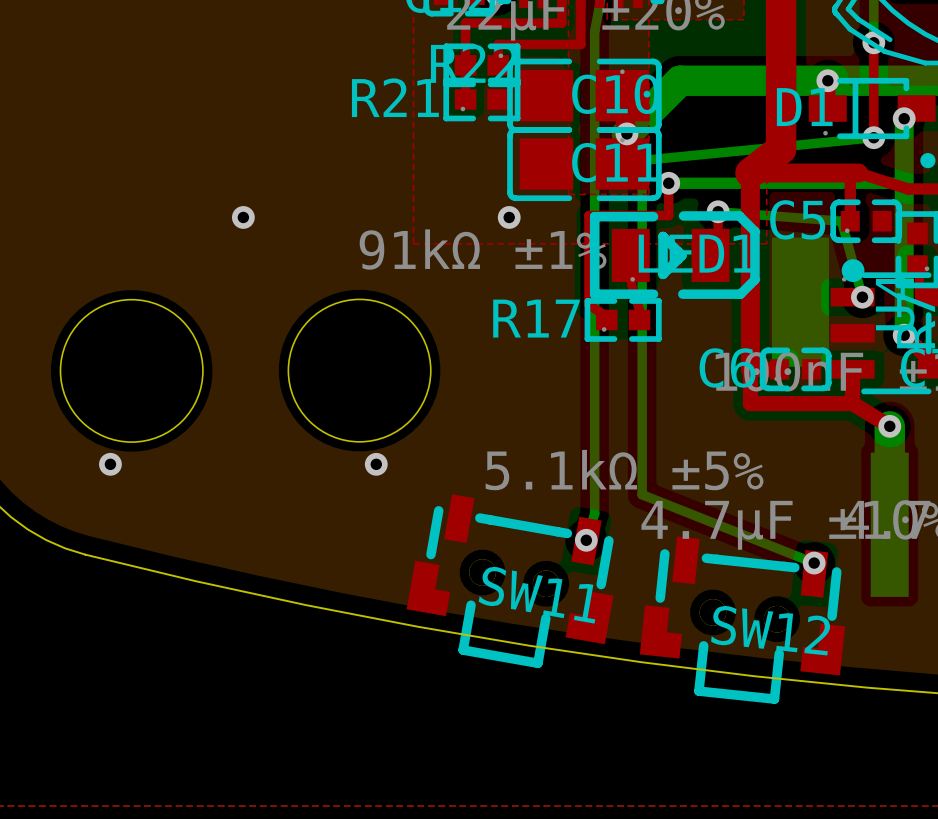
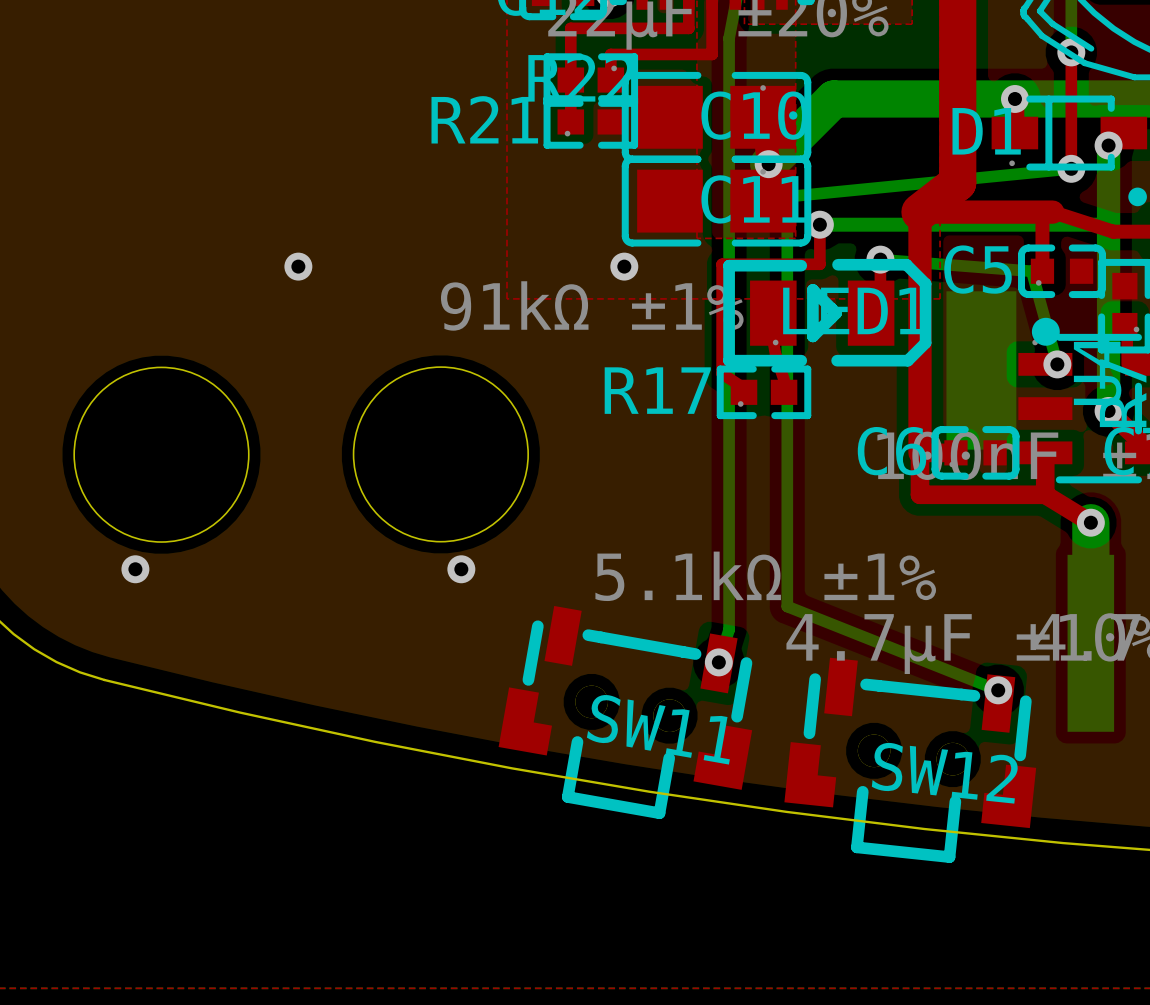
R17 value: 5.1kΩ ±5% (624, 470) -> 5.1kΩ ±1% (765, 576)

